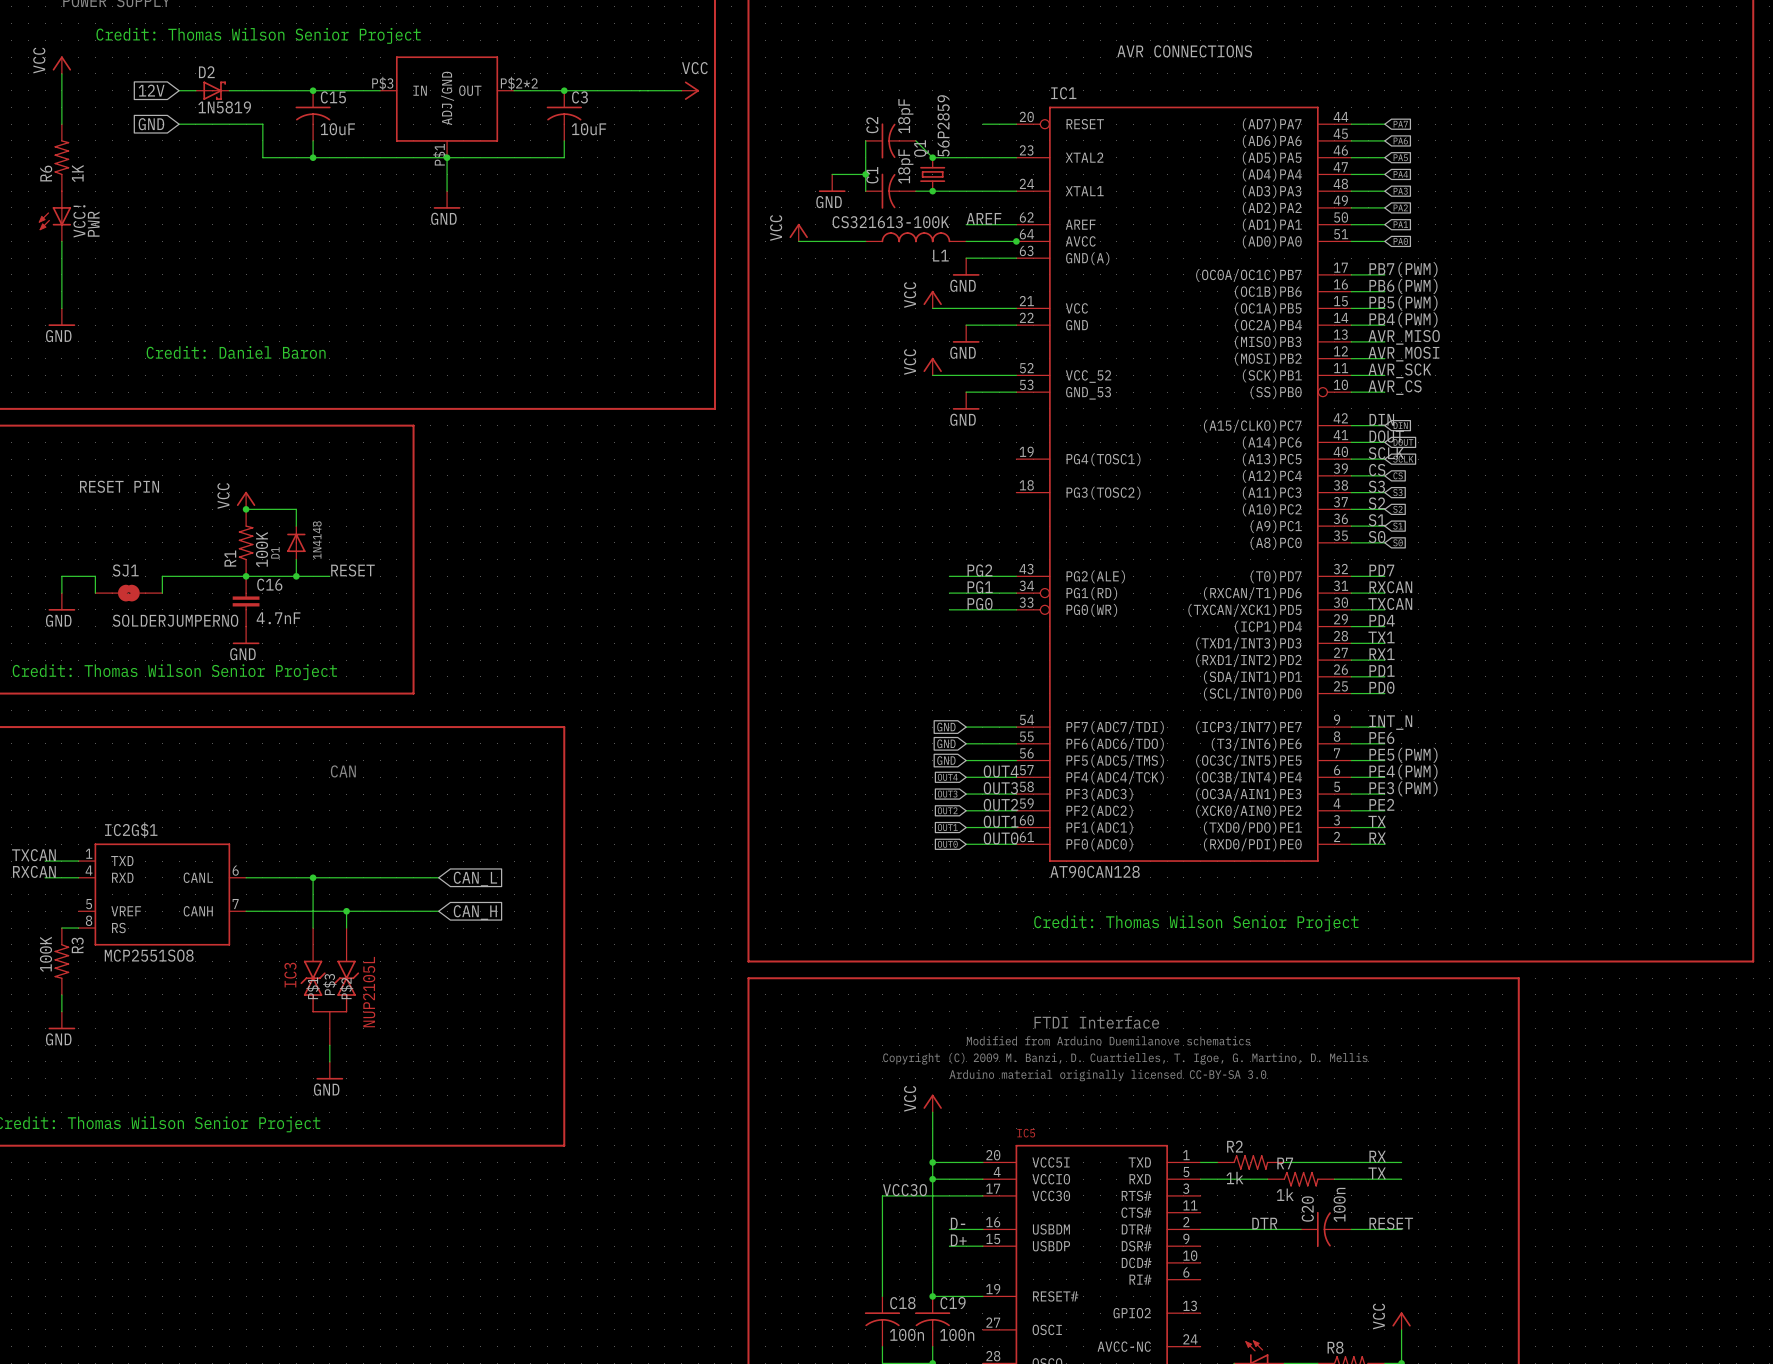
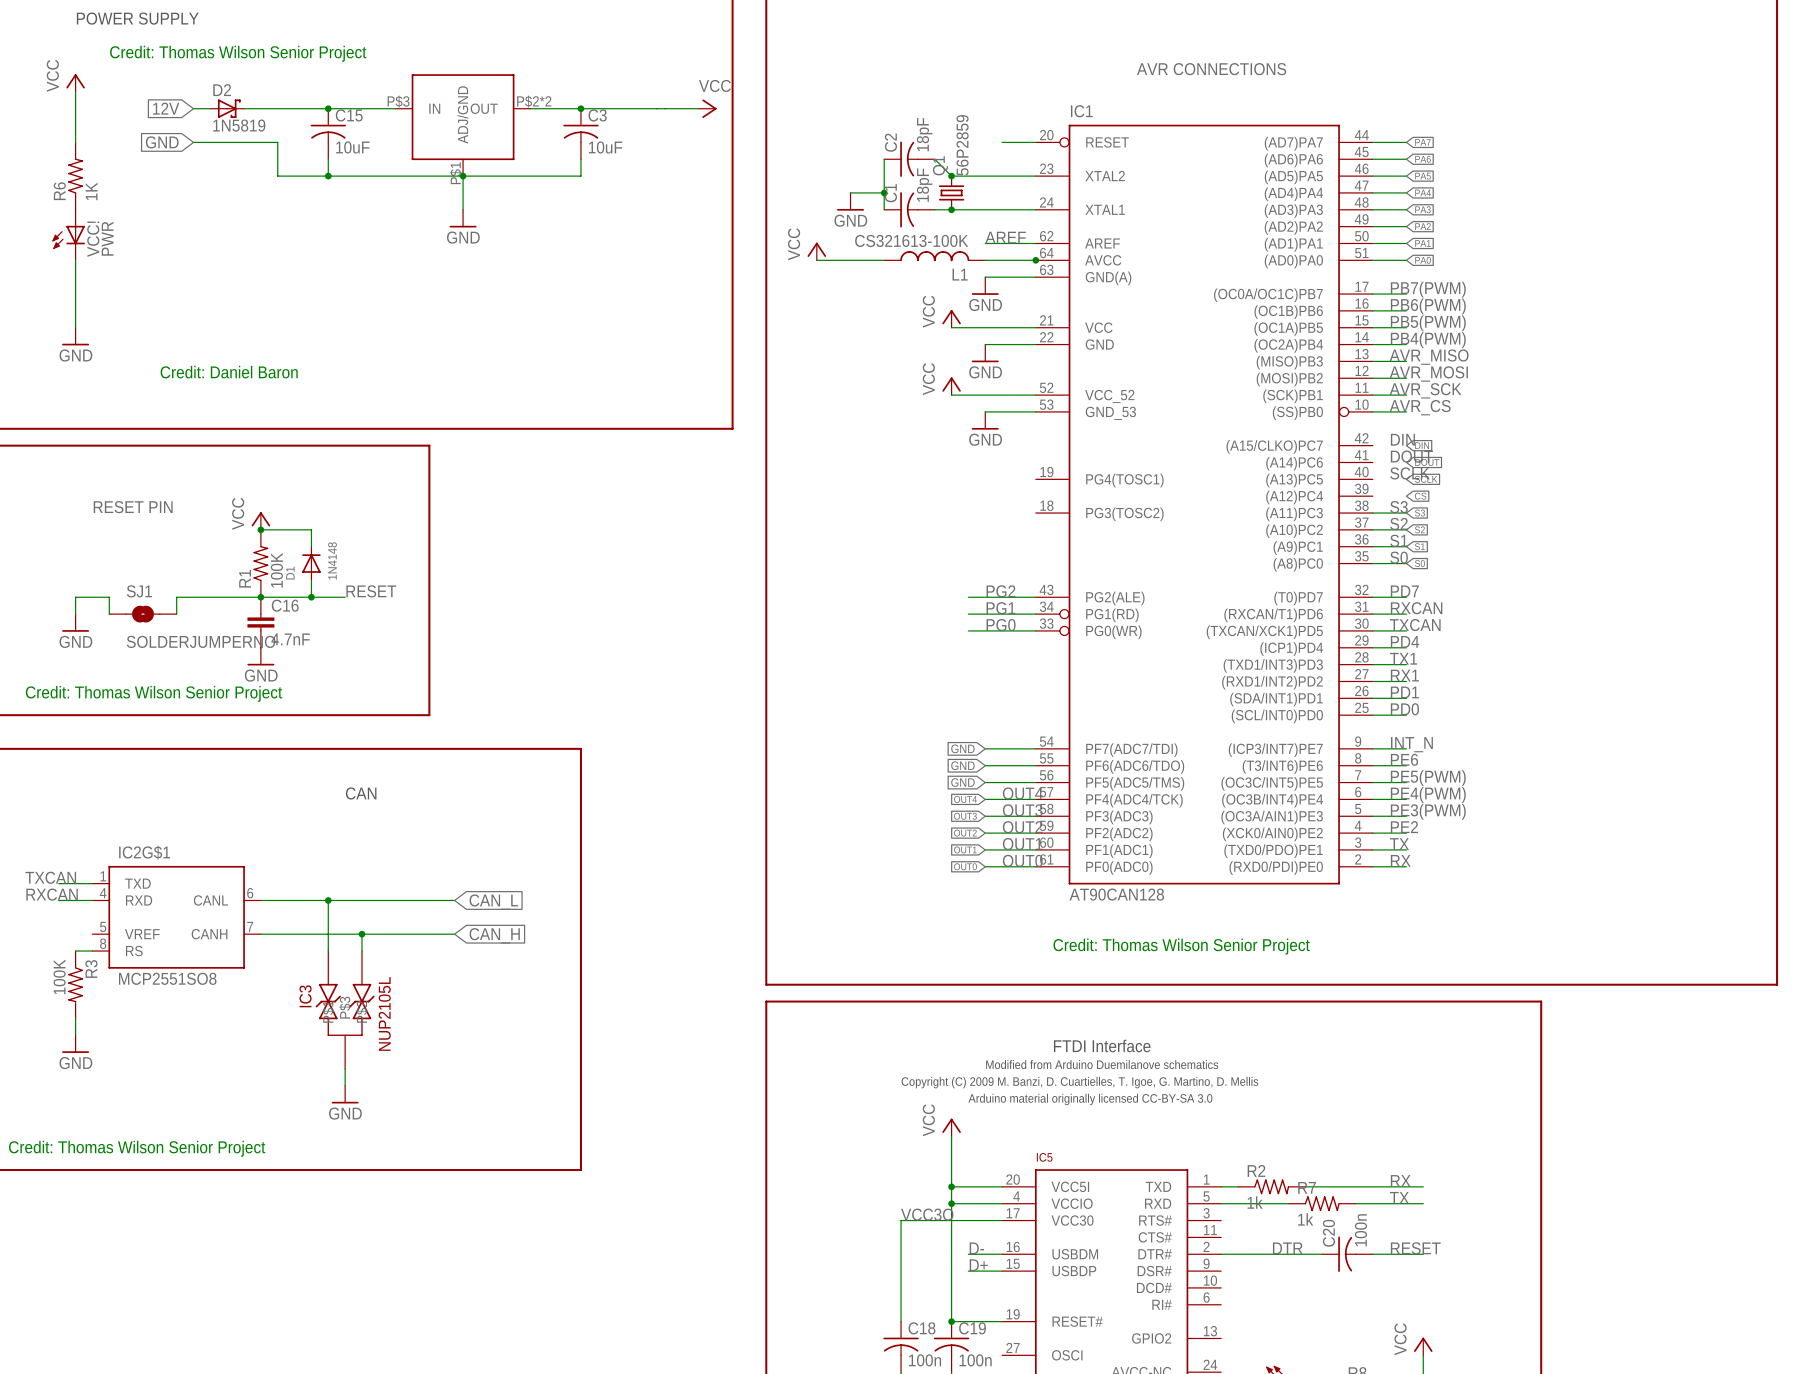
wire: (1351, 425) (1384, 425) -> none
wire: (1351, 442) (1384, 442) -> none
wire: (1351, 459) (1384, 459) -> none
label: CS (1377, 470) -> none
wire: (1351, 475) (1384, 475) -> none

